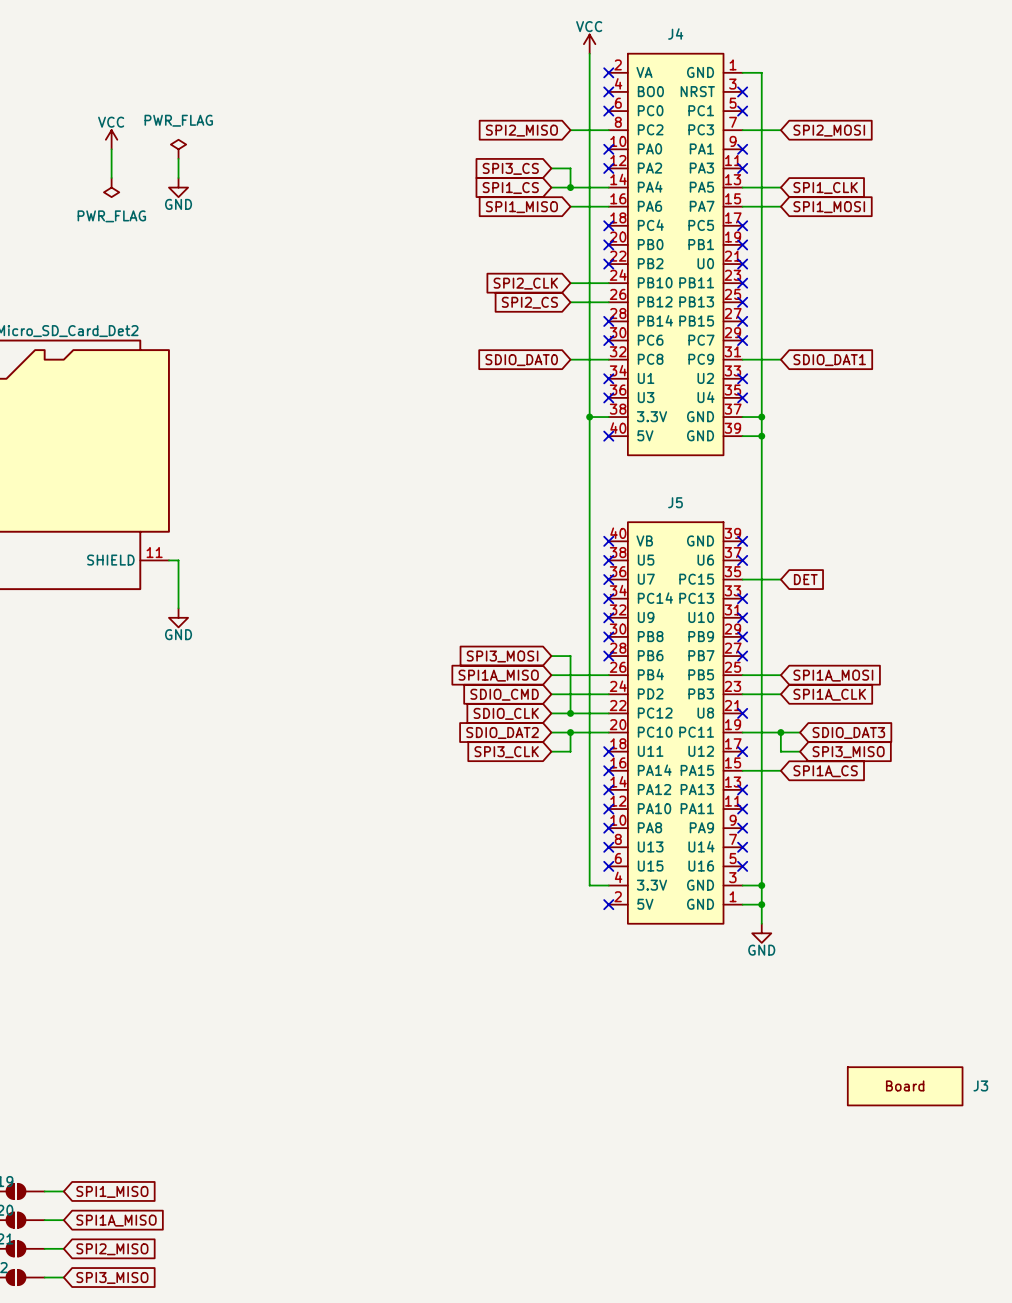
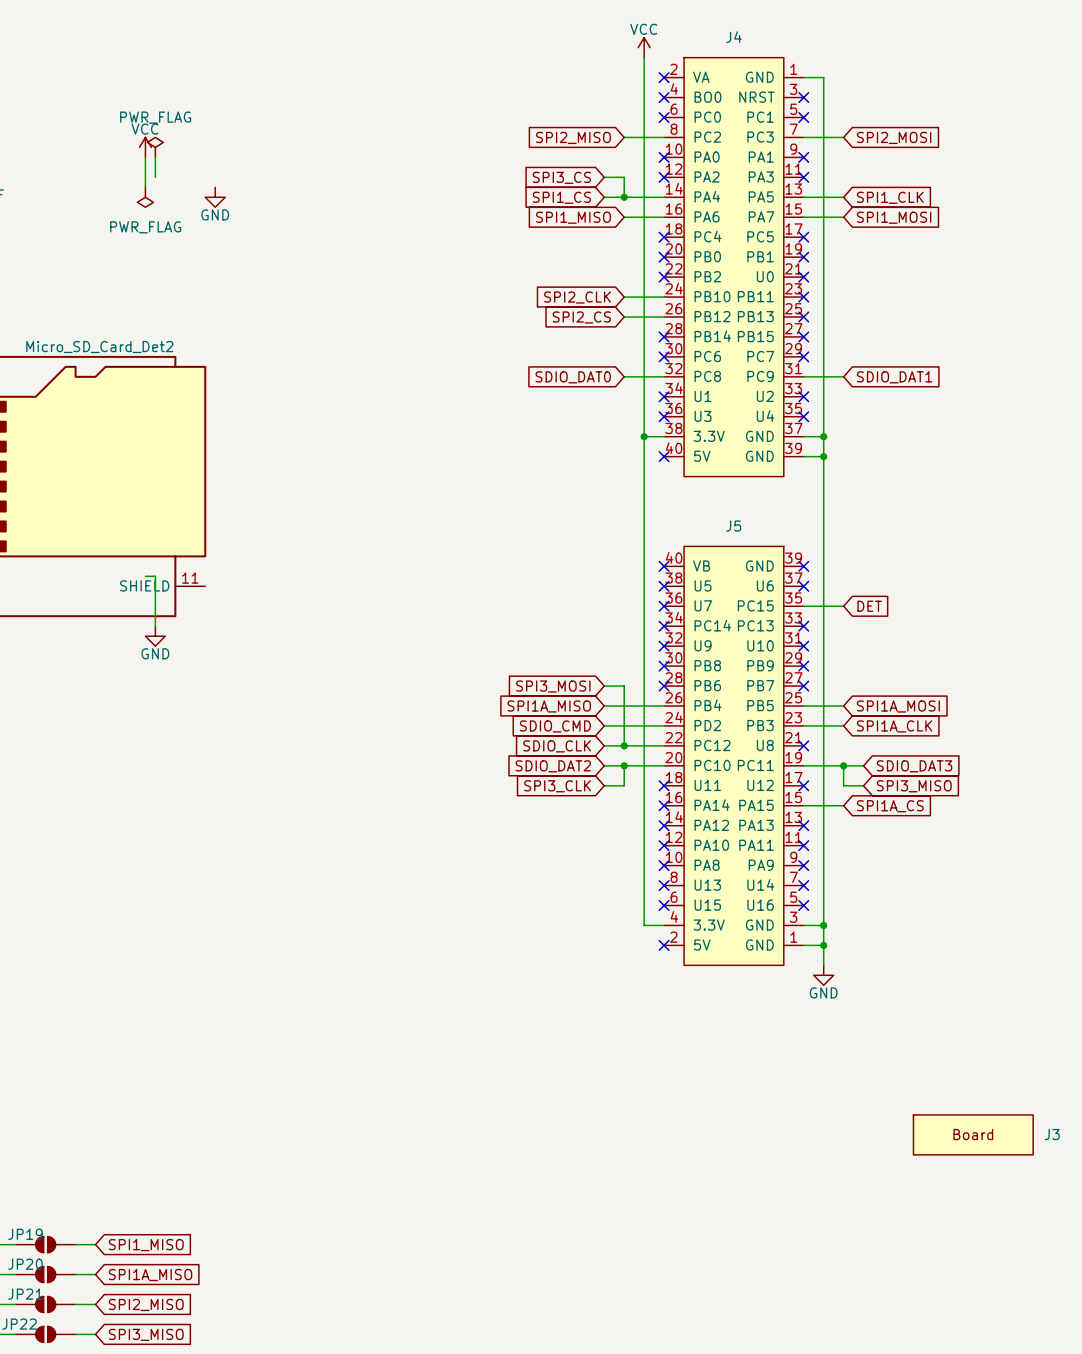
power symbol position: PWR_FLAG (178, 149) -> PWR_FLAG (155, 147)
wire: (178, 158) (178, 178) -> (155, 157) (155, 177)
wire: (168, 560) (178, 560) (178, 608) -> (145, 576) (155, 576) (155, 626)
power symbol position: GND (178, 617) -> GND (155, 636)

